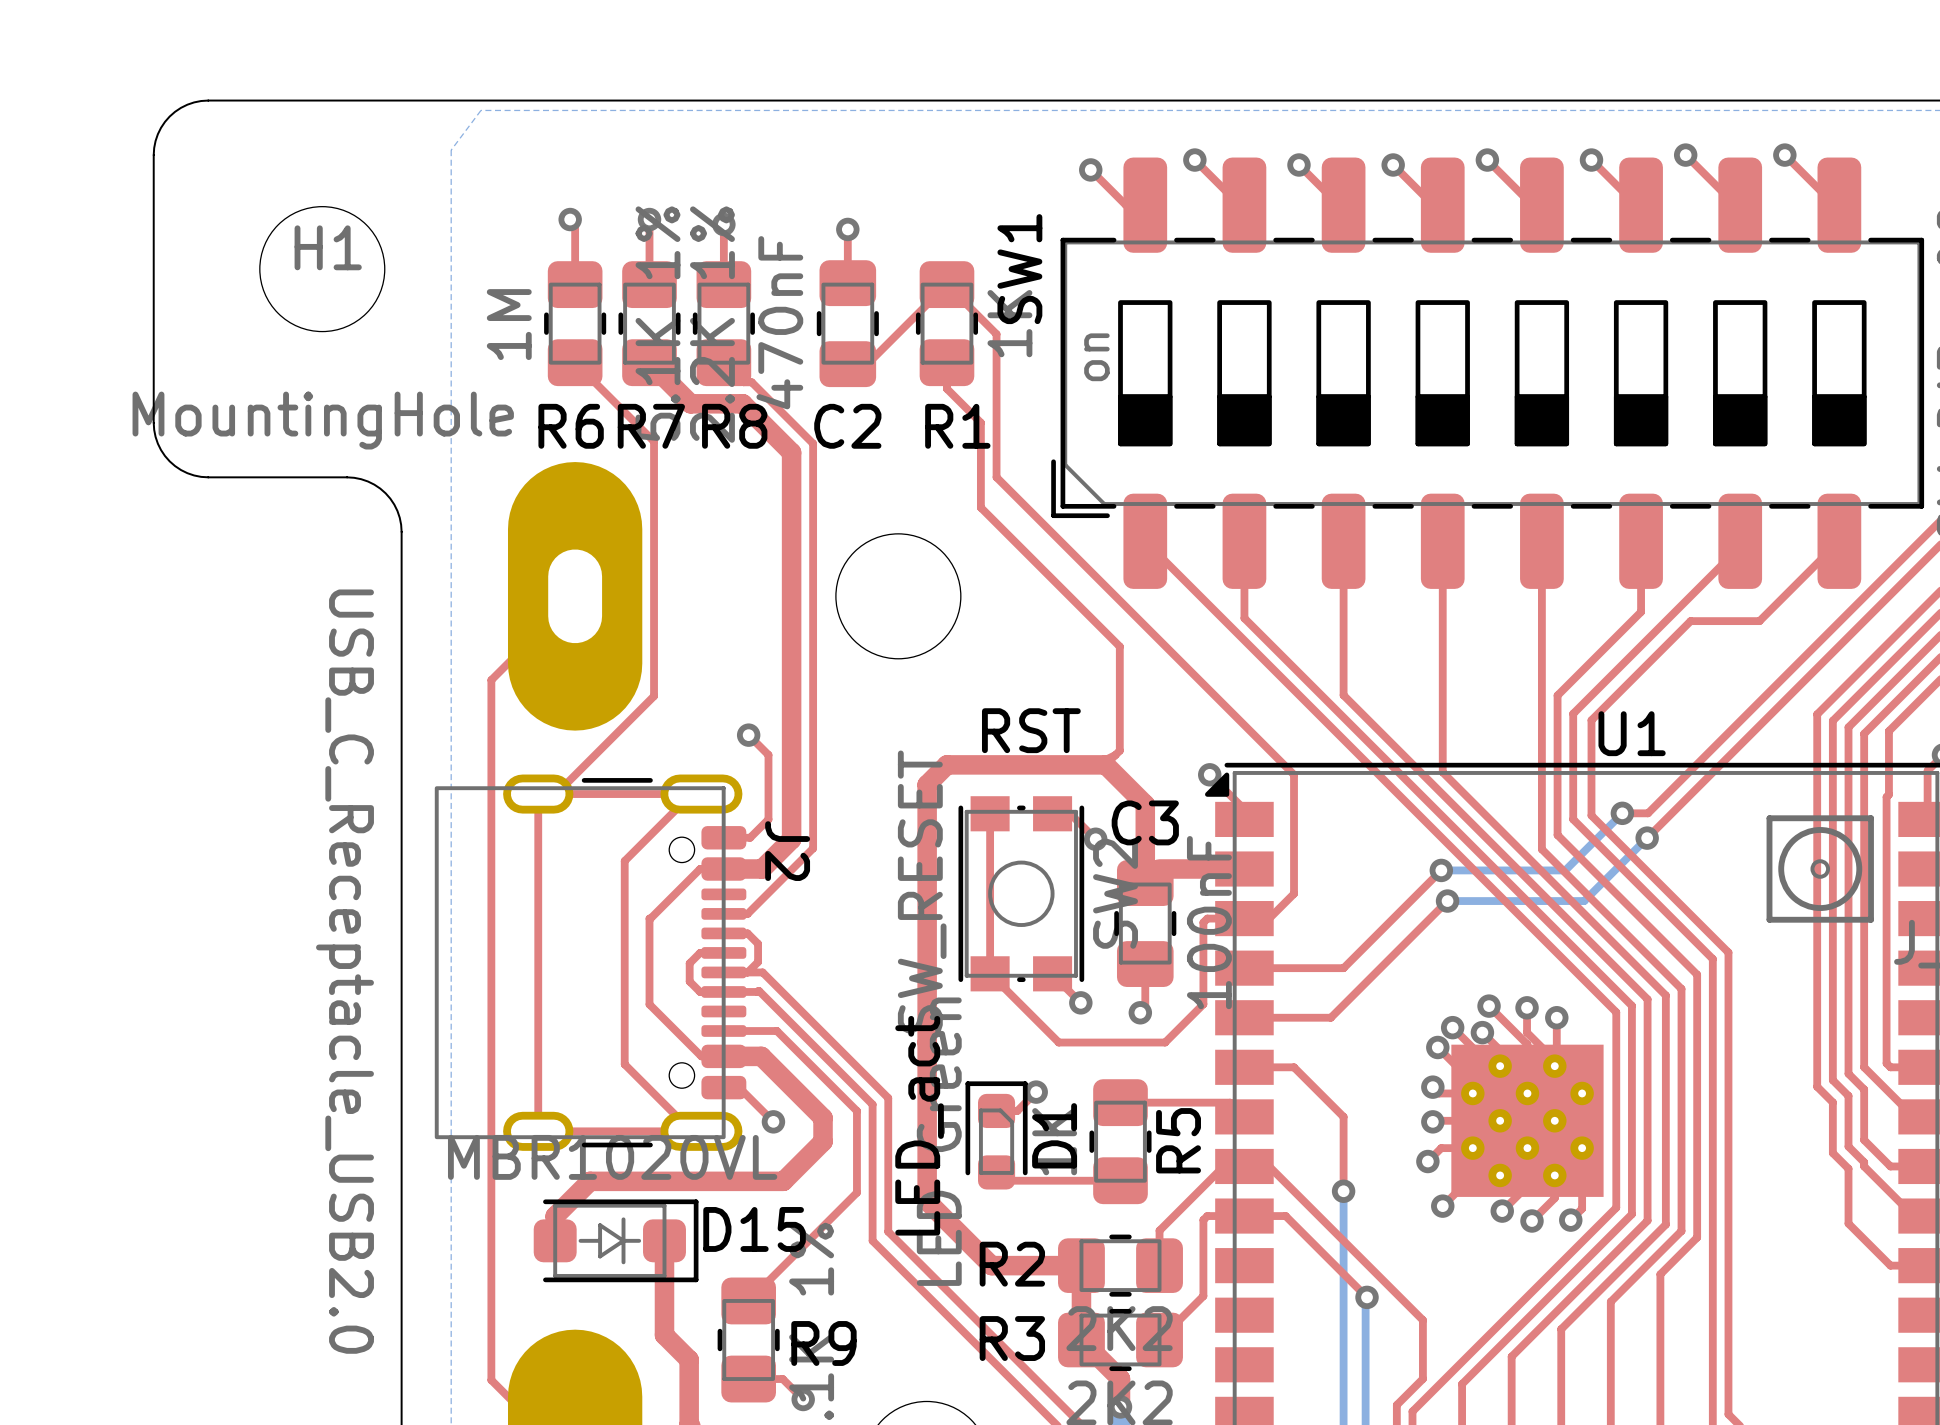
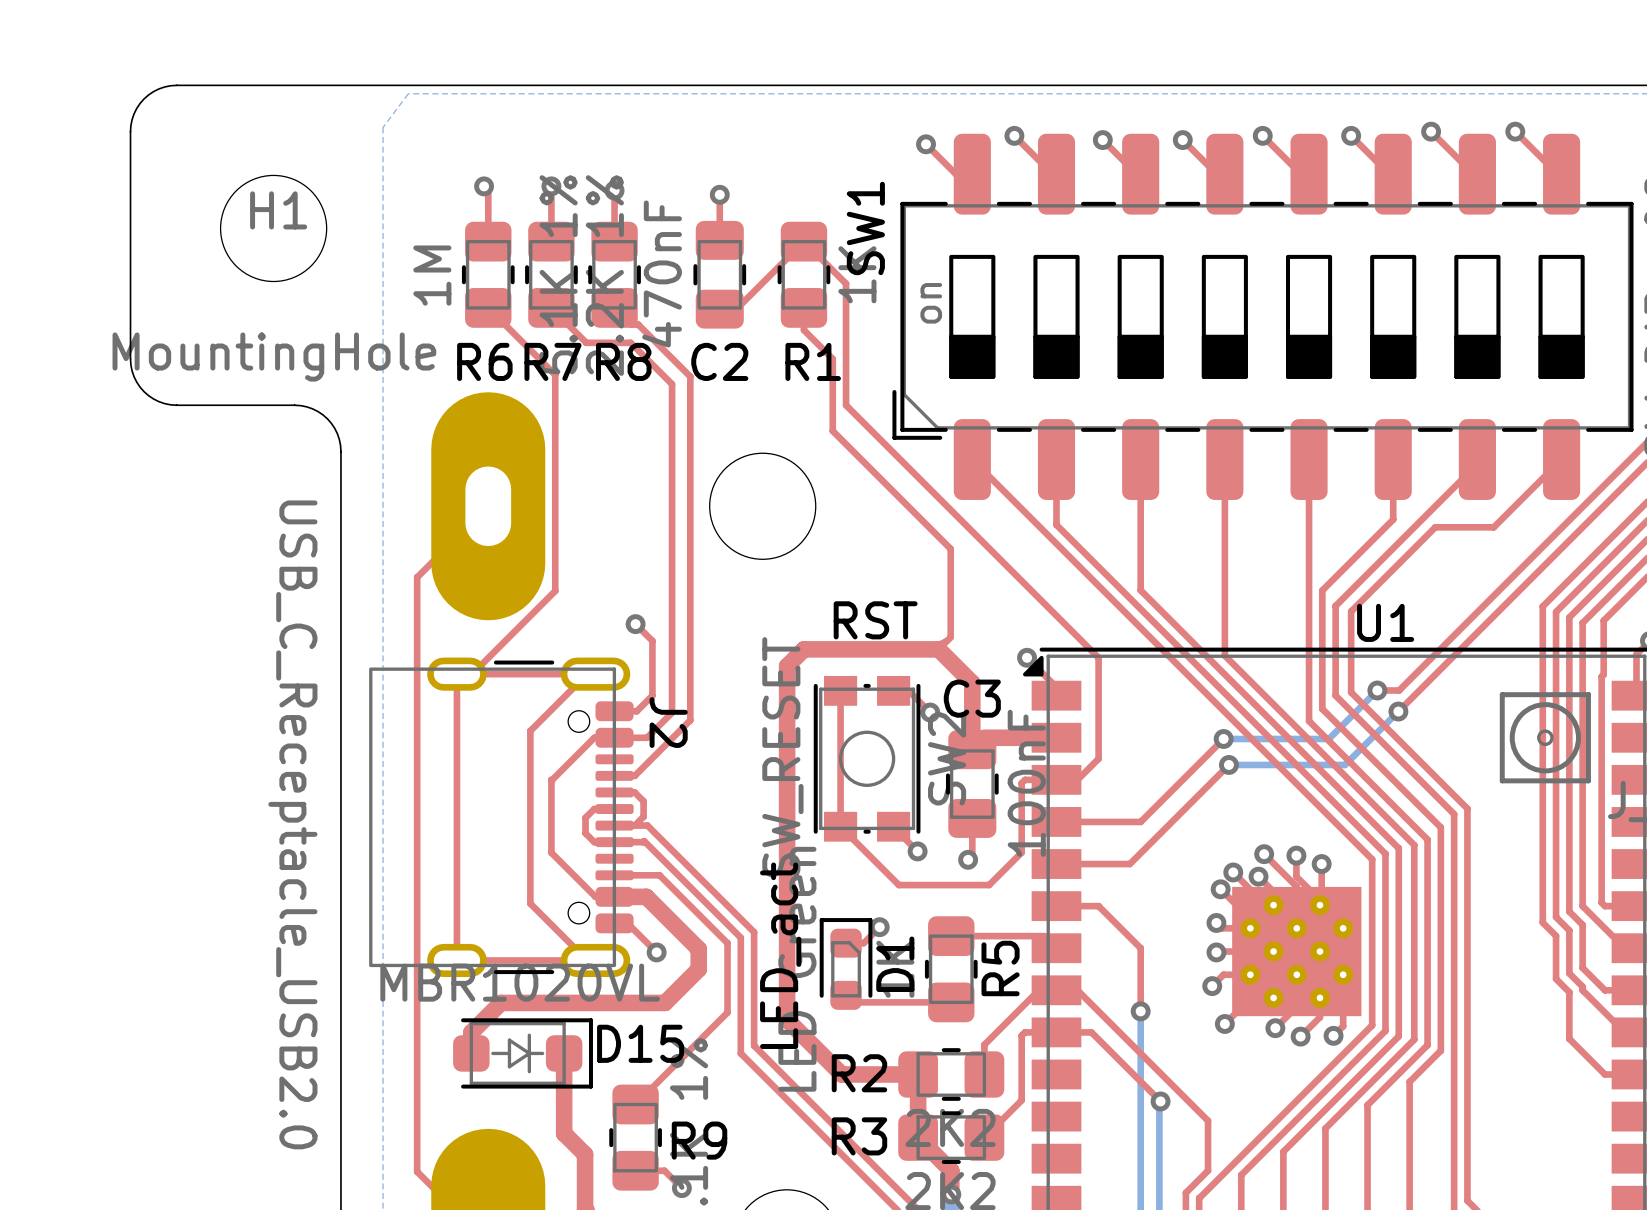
top track width: thick (649, 362) (690, 403) (742, 403) (791, 452) (791, 839) (762, 869) (723, 869) -> thin (551, 307) (586, 342) (630, 342) (672, 384) (672, 712) (647, 737) (614, 737)

